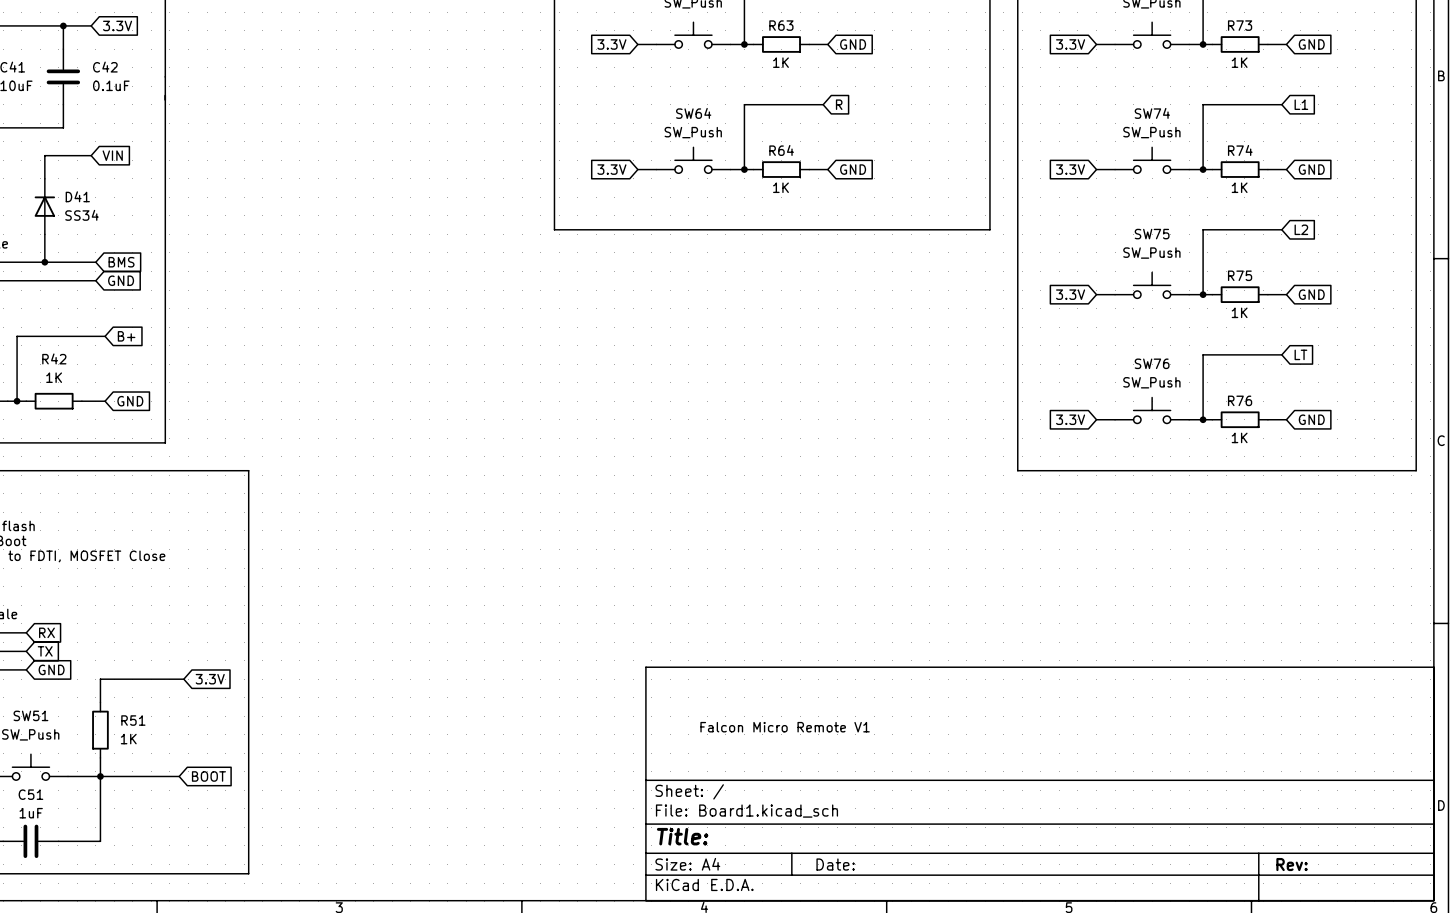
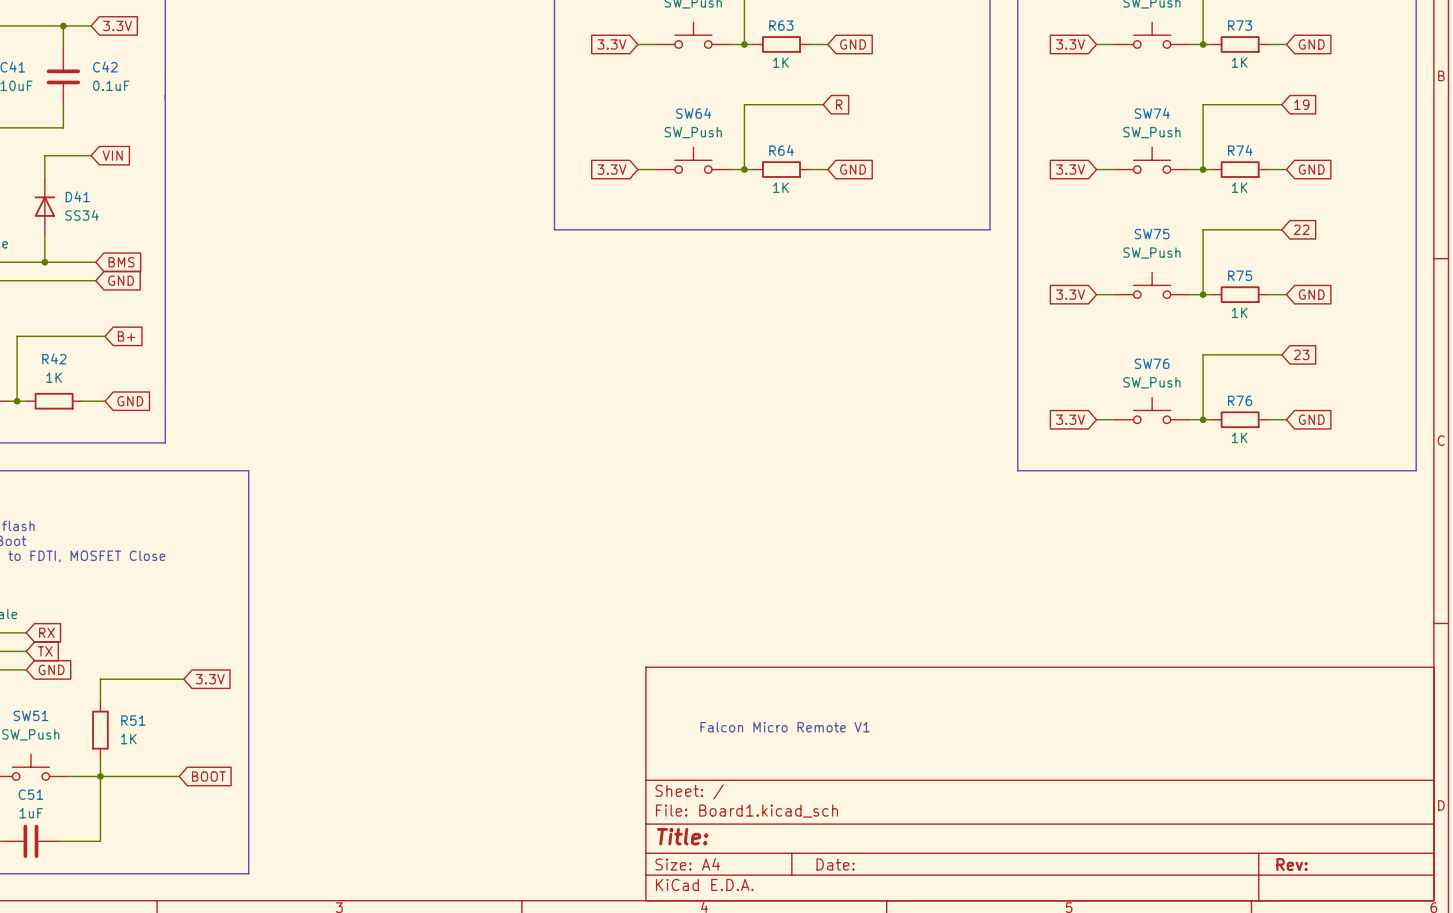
global label: L1 (1301, 104) -> 19 (1301, 104)
global label: L2 (1301, 229) -> 22 (1301, 229)
global label: LT (1300, 354) -> 23 (1301, 354)

